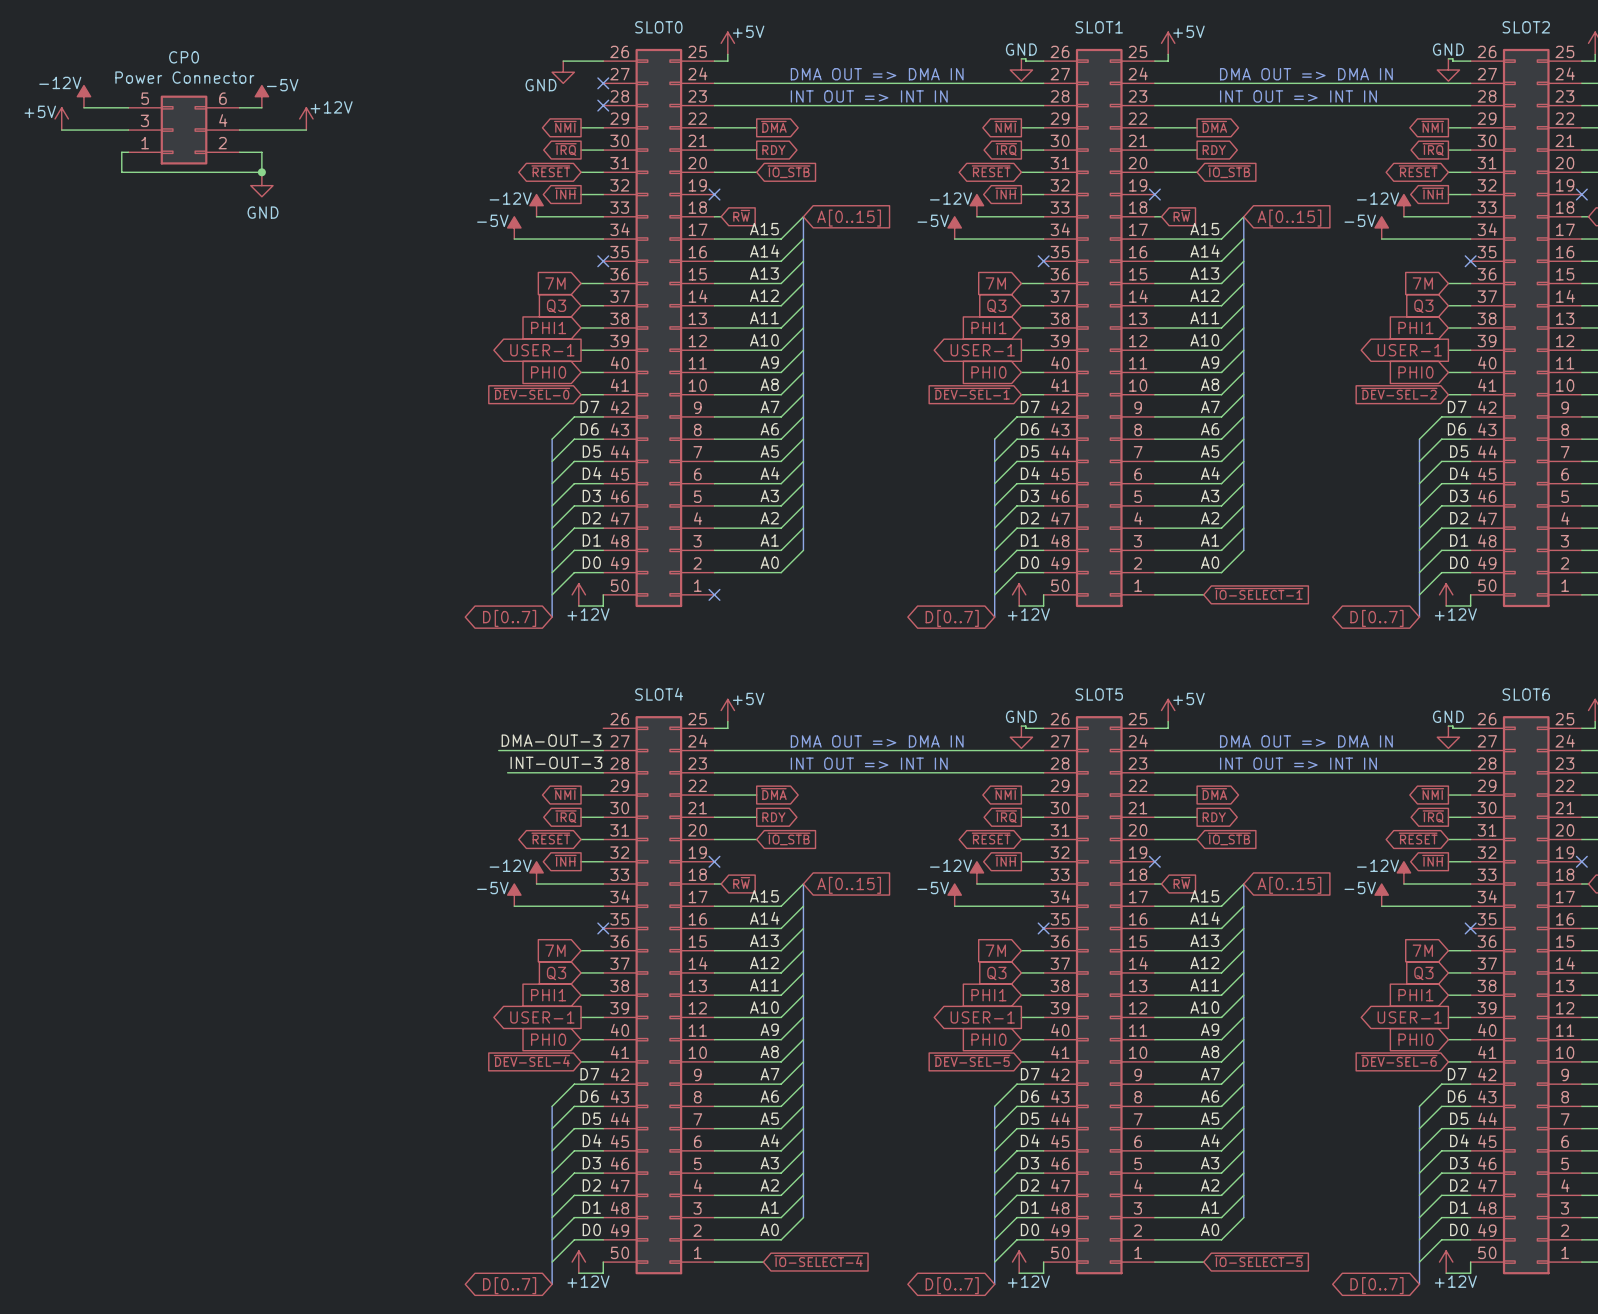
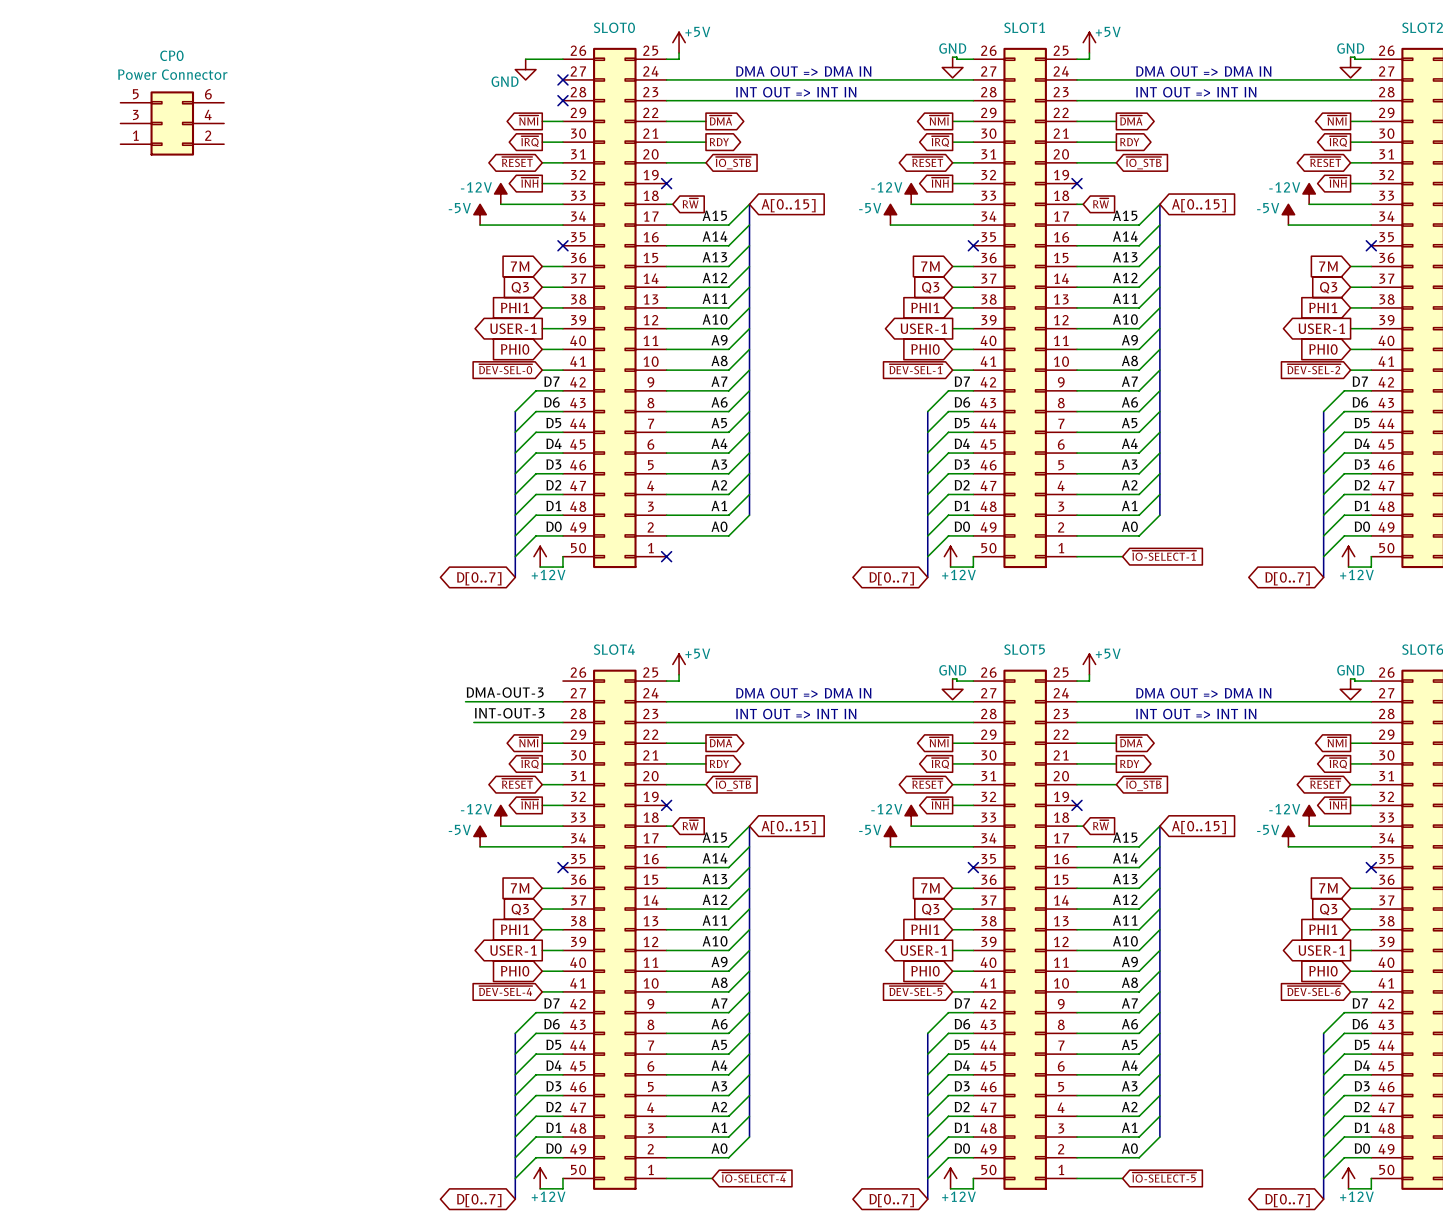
power symbol: -12V (83, 96) -> none
power symbol: -5V (261, 96) -> none
wire: (83, 107) (128, 107) -> none
wire: (239, 107) (261, 107) -> none
power symbol: +5V (61, 118) -> none
power symbol: +12V (306, 118) -> none
wire: (61, 130) (128, 130) -> none
wire: (239, 130) (306, 130) -> none
wire: (128, 152) (121, 152) (121, 172) (261, 172) -> none
wire: (239, 152) (261, 152) (261, 174) -> none
junction: (261, 172) -> none
power symbol: GND (261, 185) -> none

